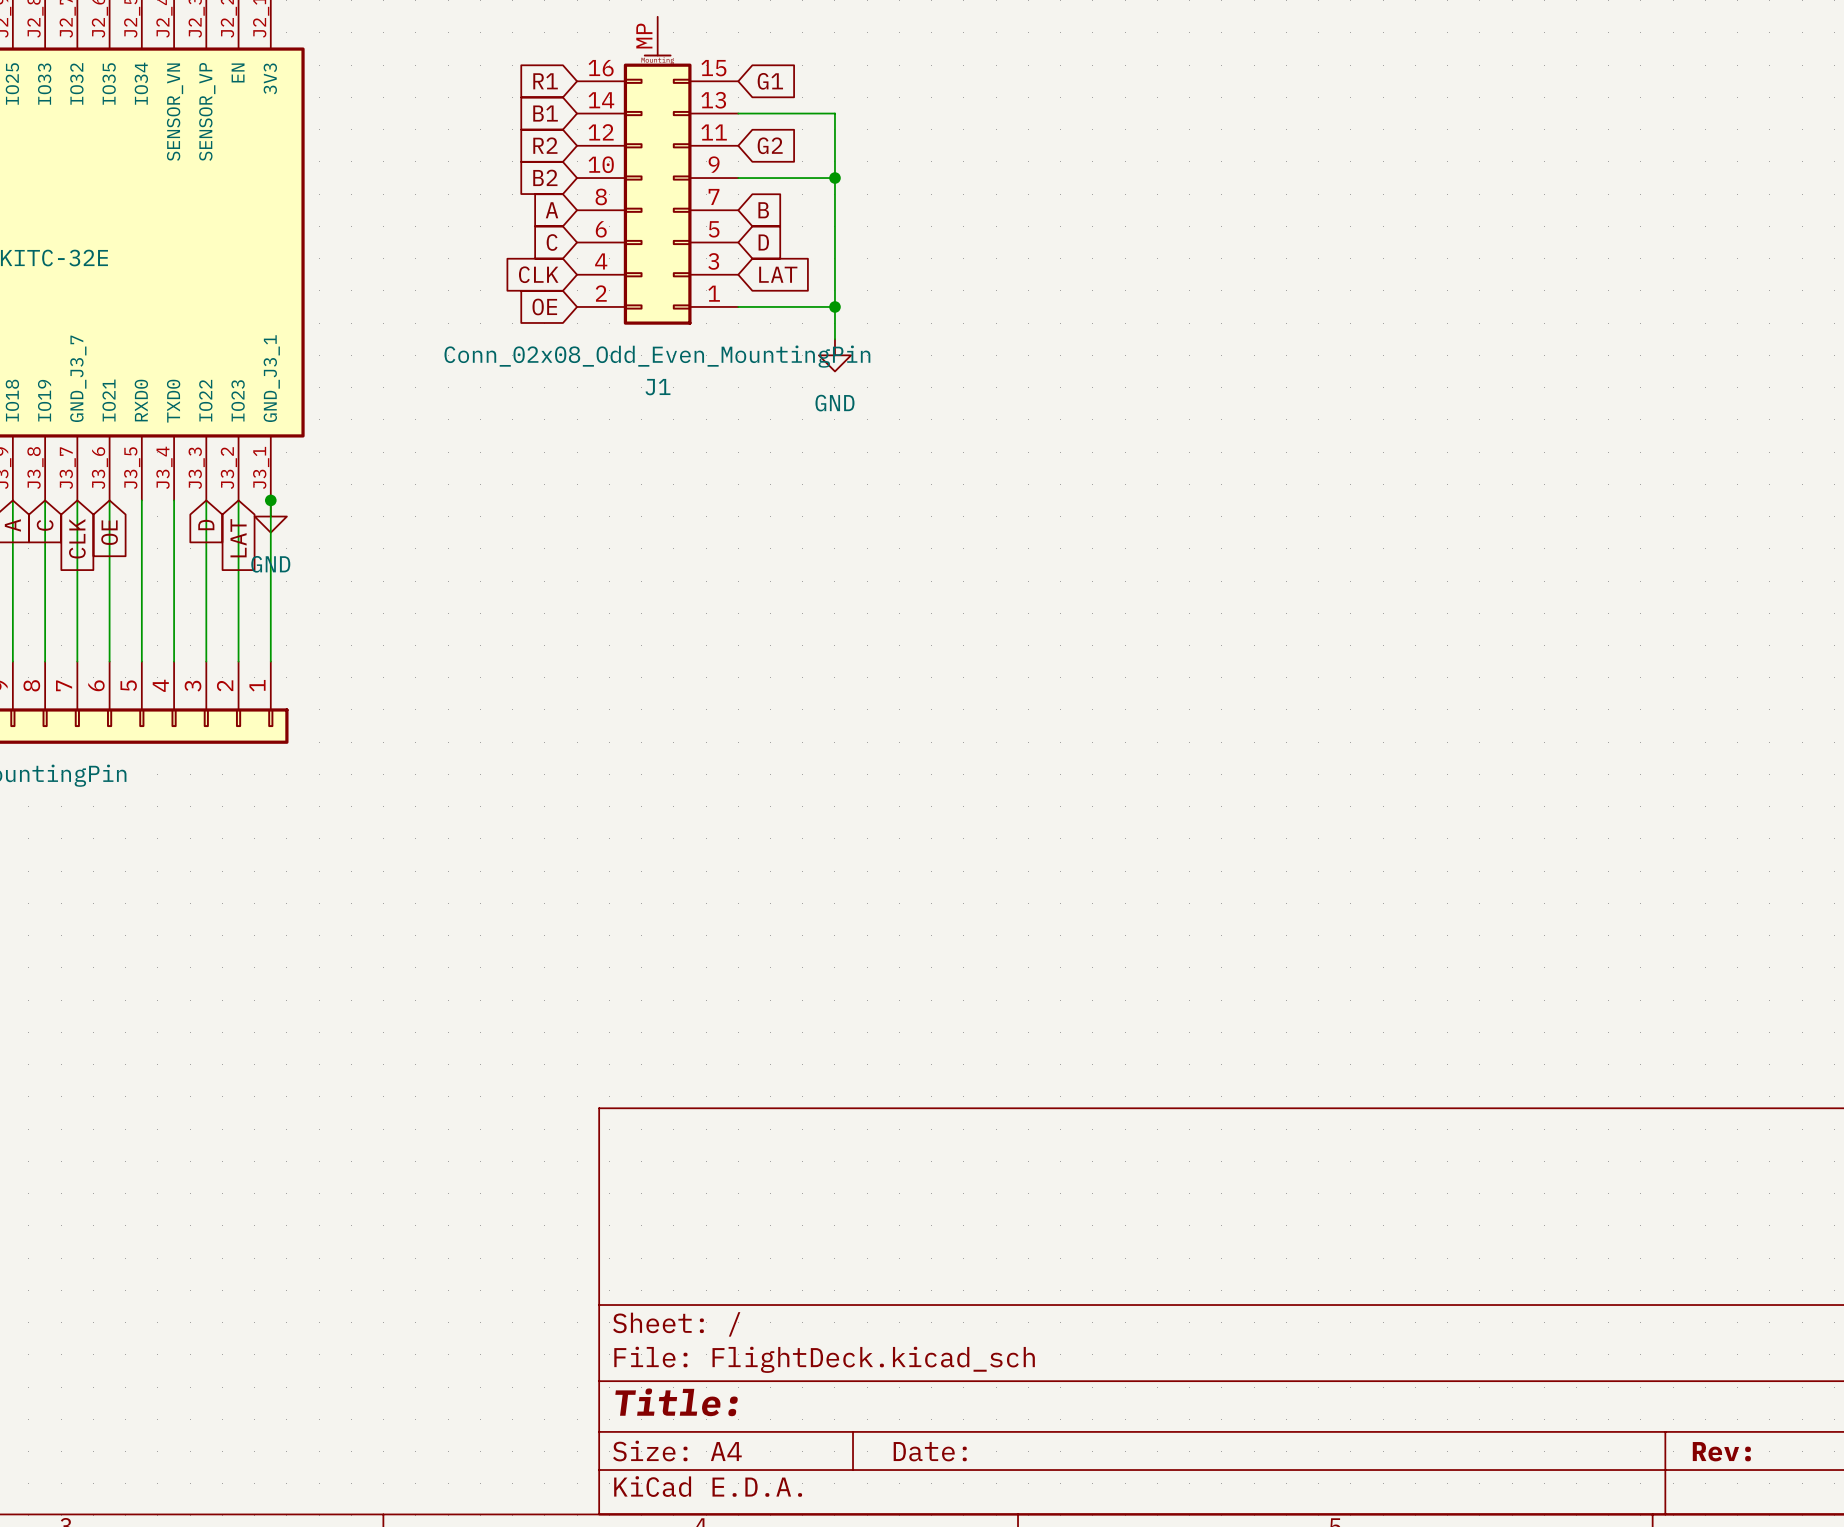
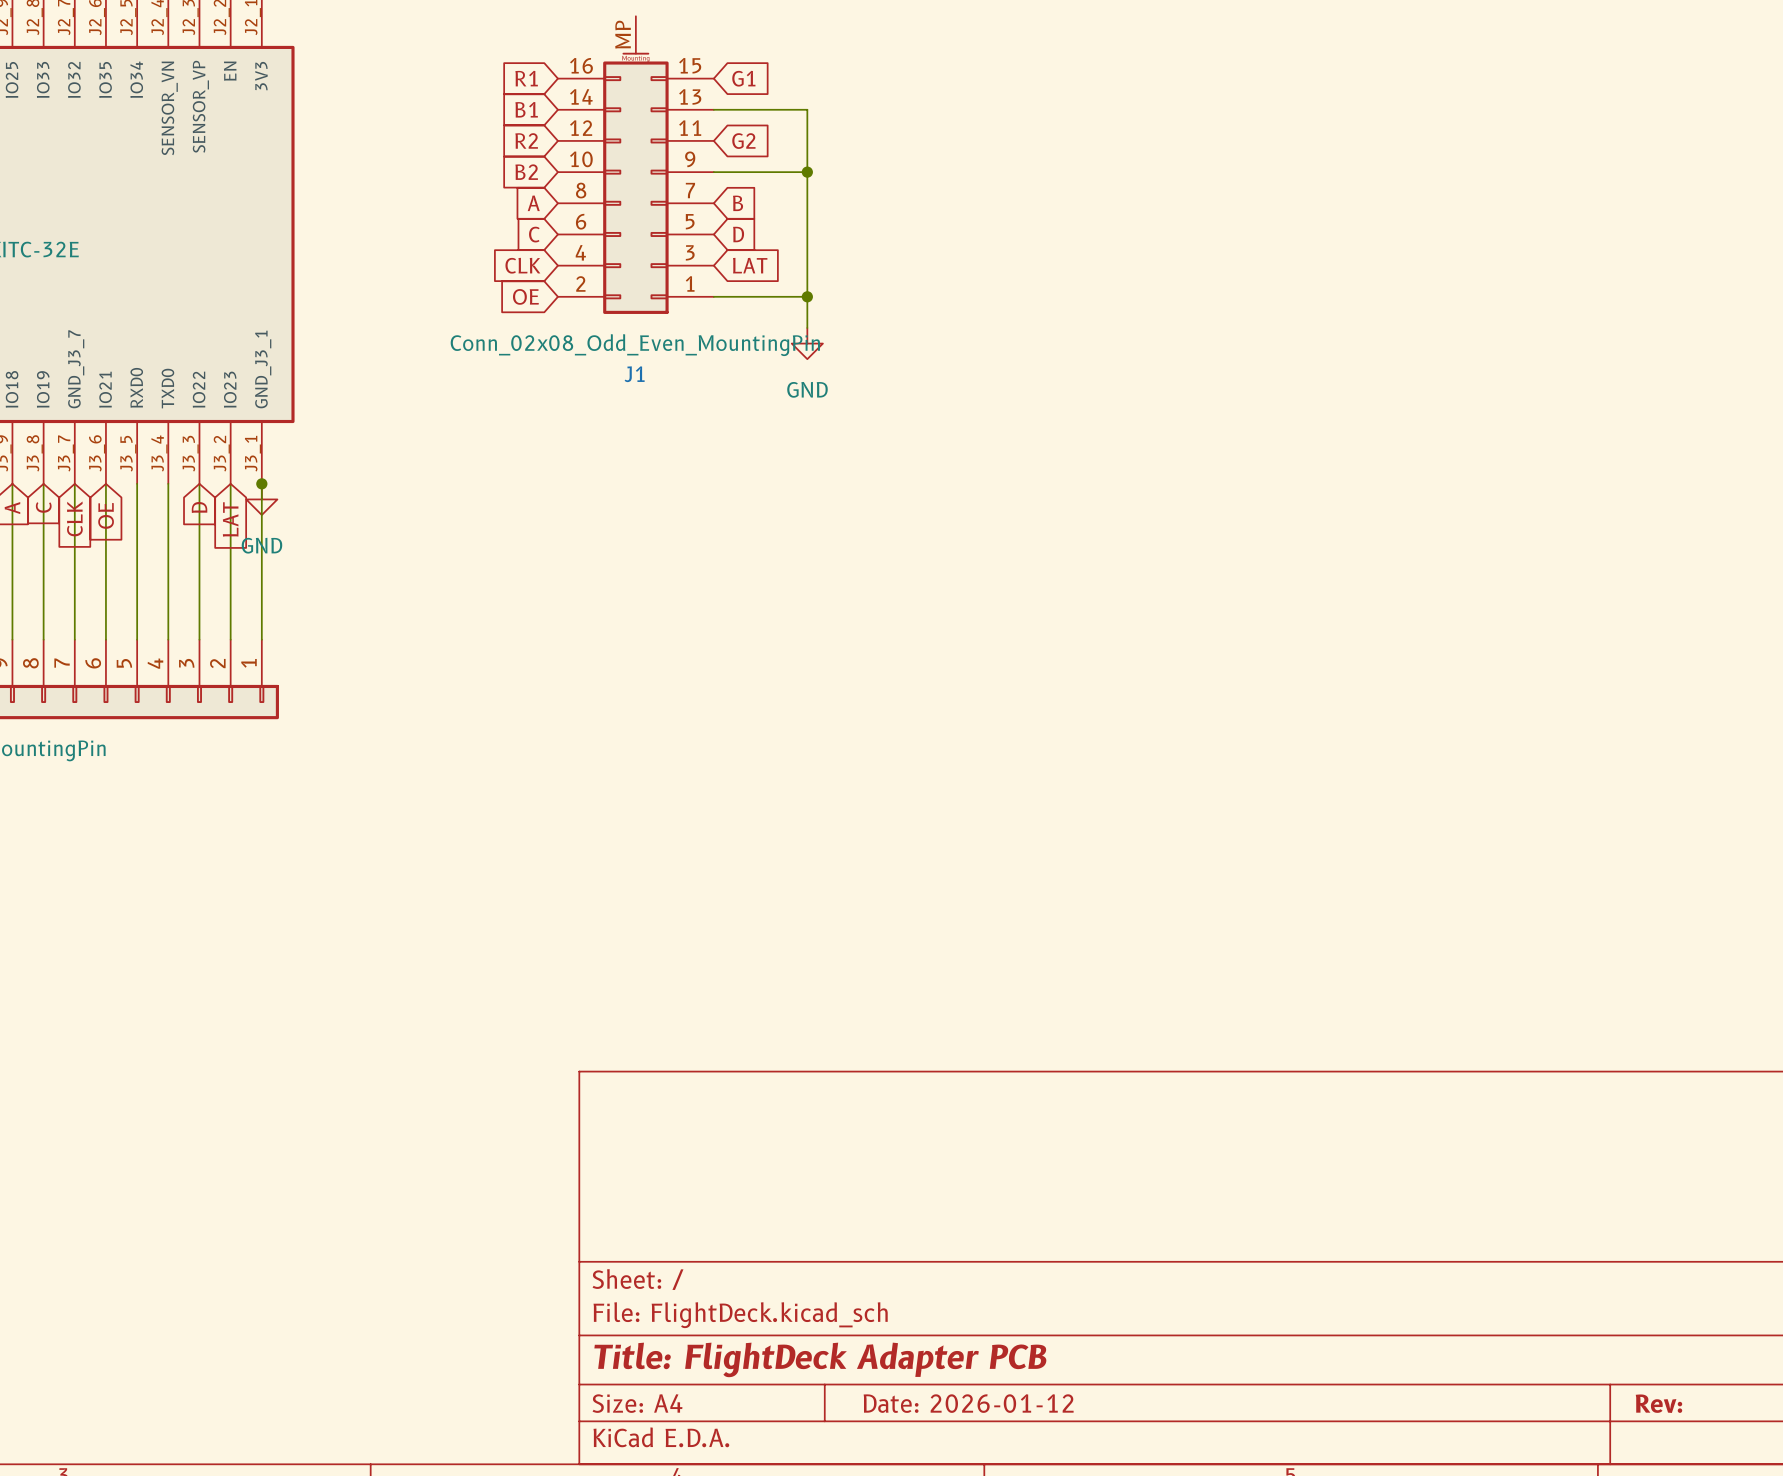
title block: Title: (676, 1402) -> Title: FlightDeck Adapter PCB (820, 1359)
title block: Date: (930, 1451) -> Date: 2026-01-12 (968, 1403)

